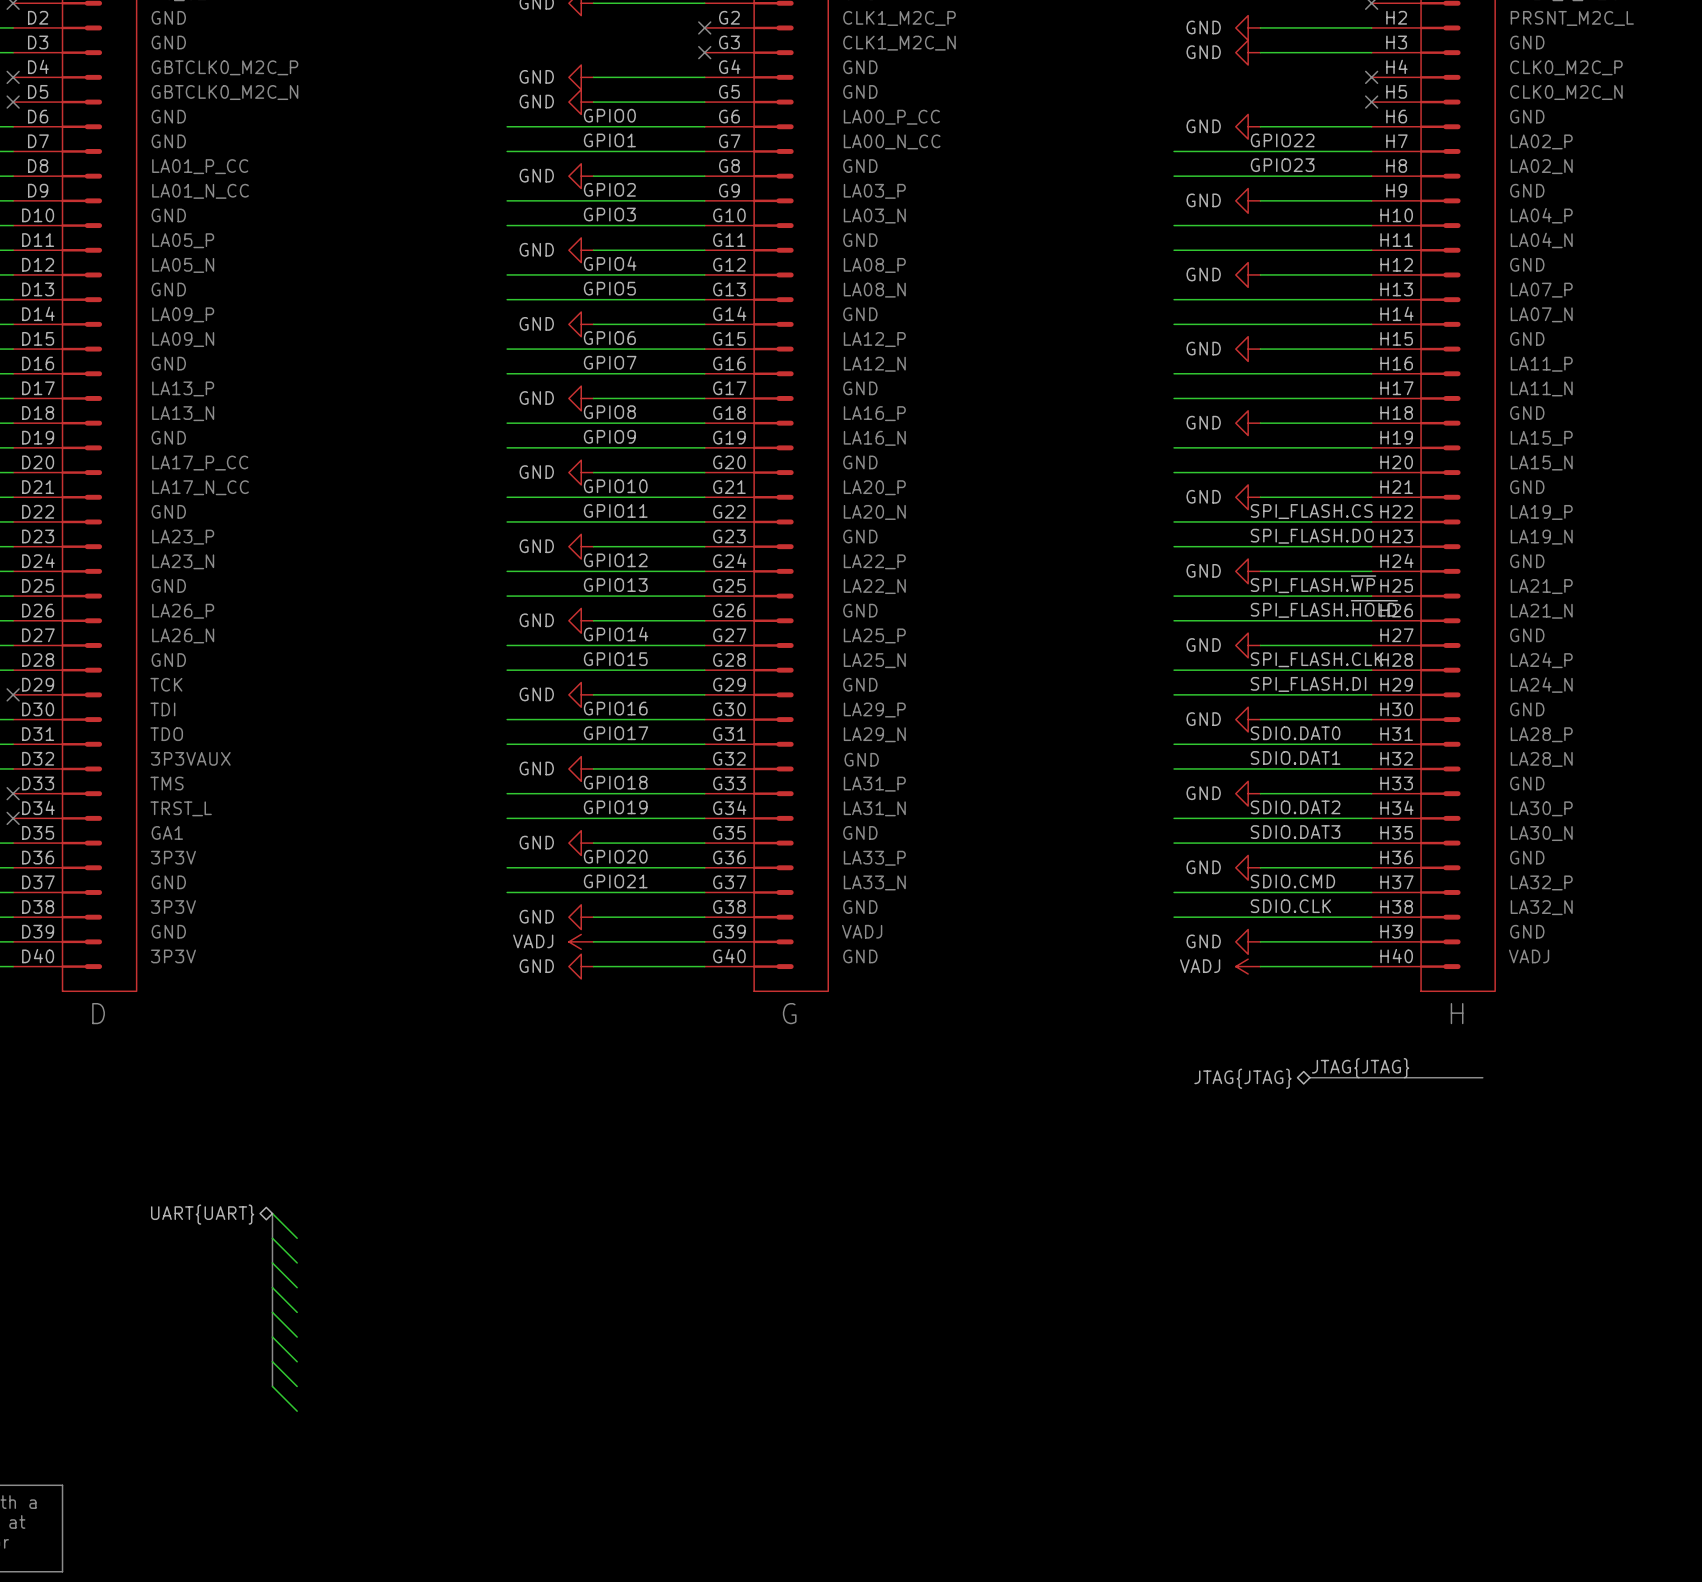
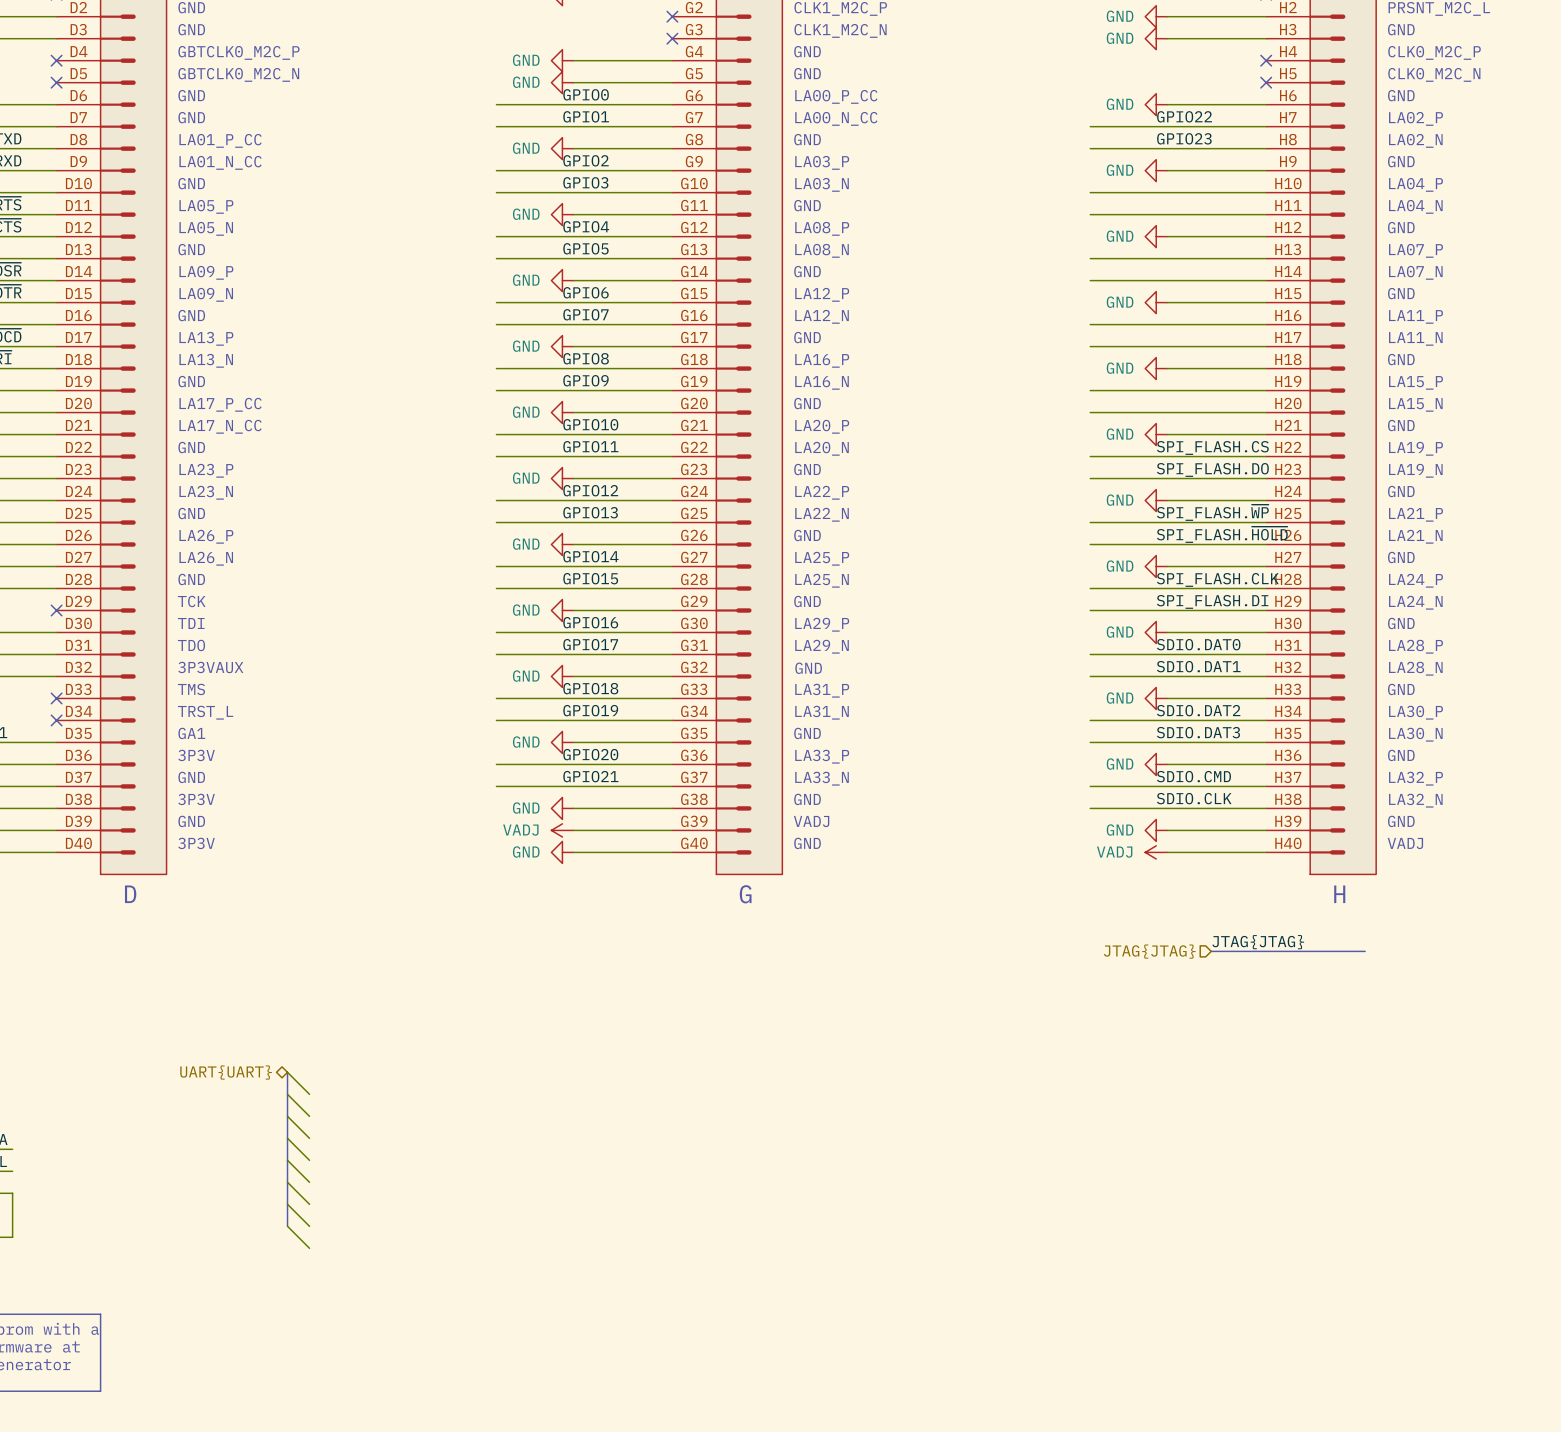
hierarchical label shape: bidirectional (1242, 1078) -> input (1149, 951)

